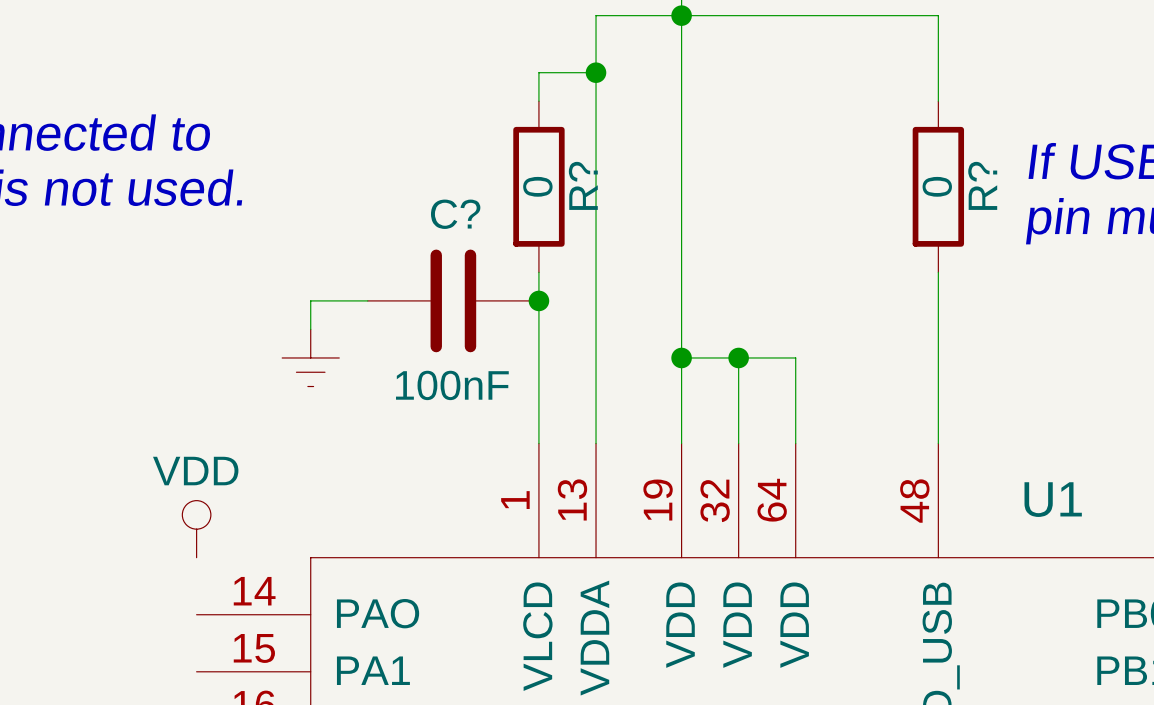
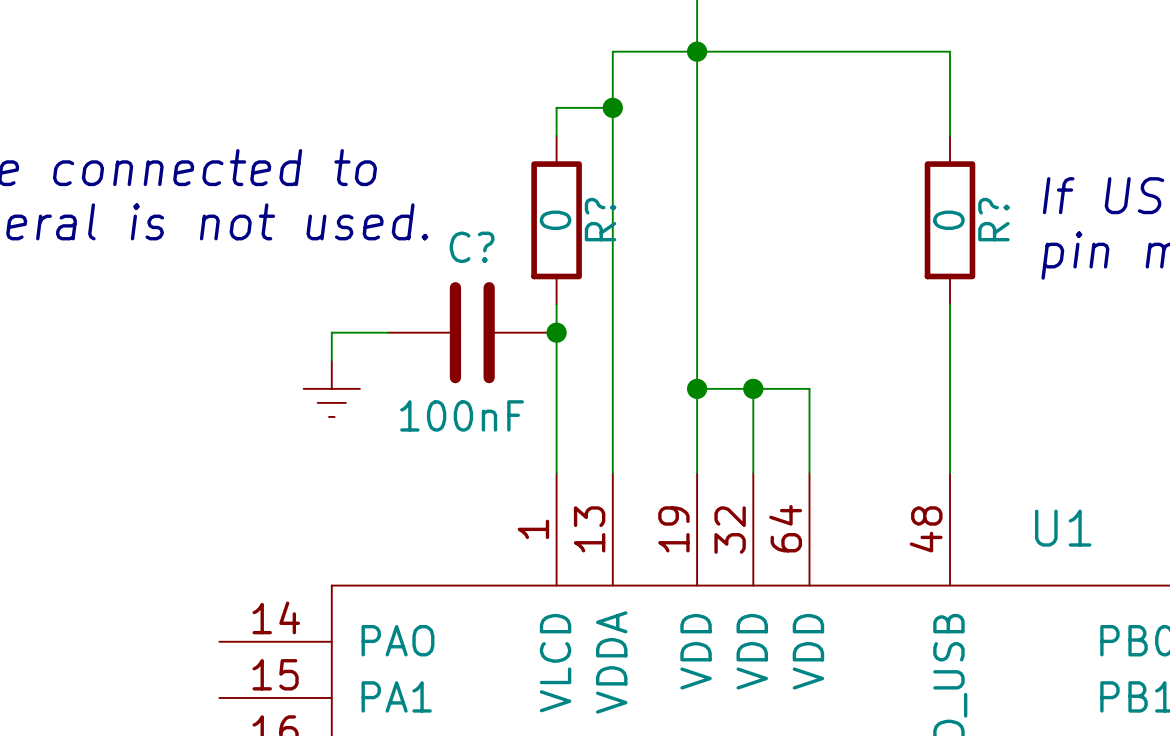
power symbol: VDD (196, 529) -> none

